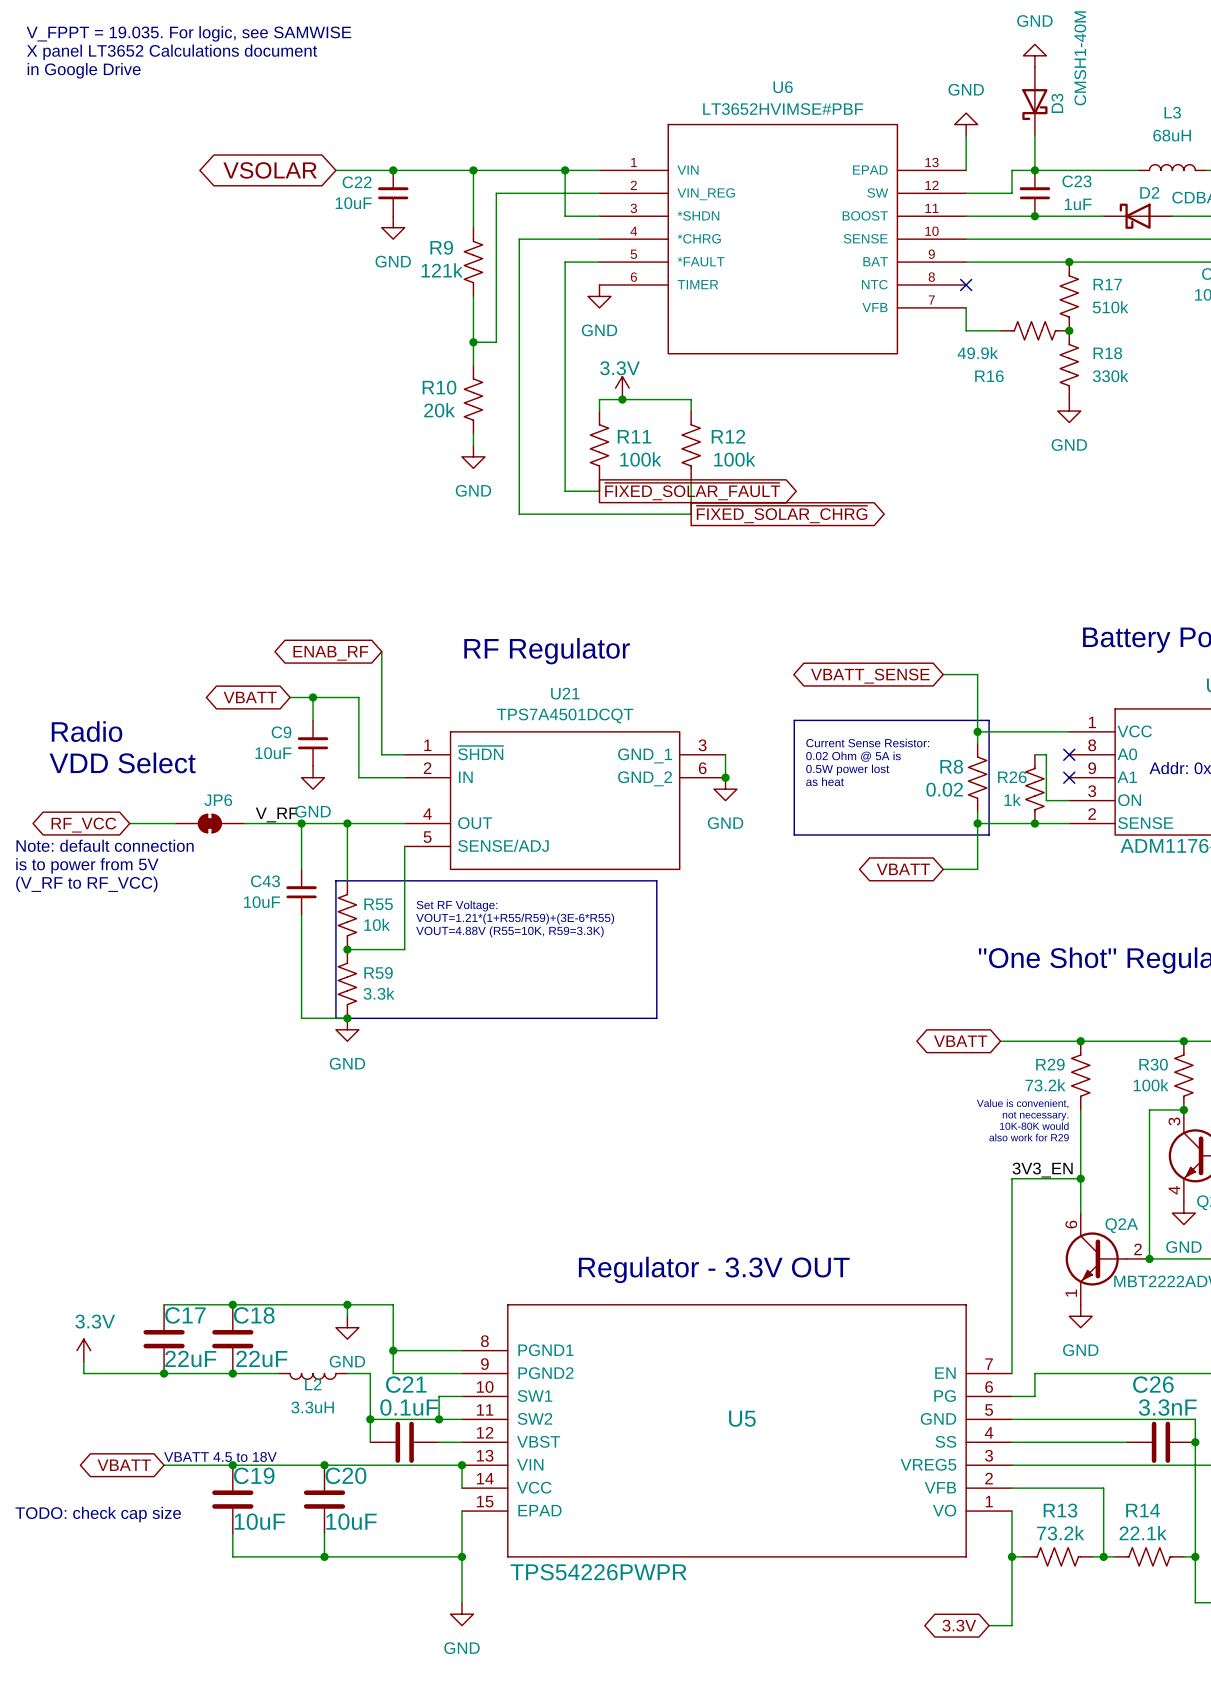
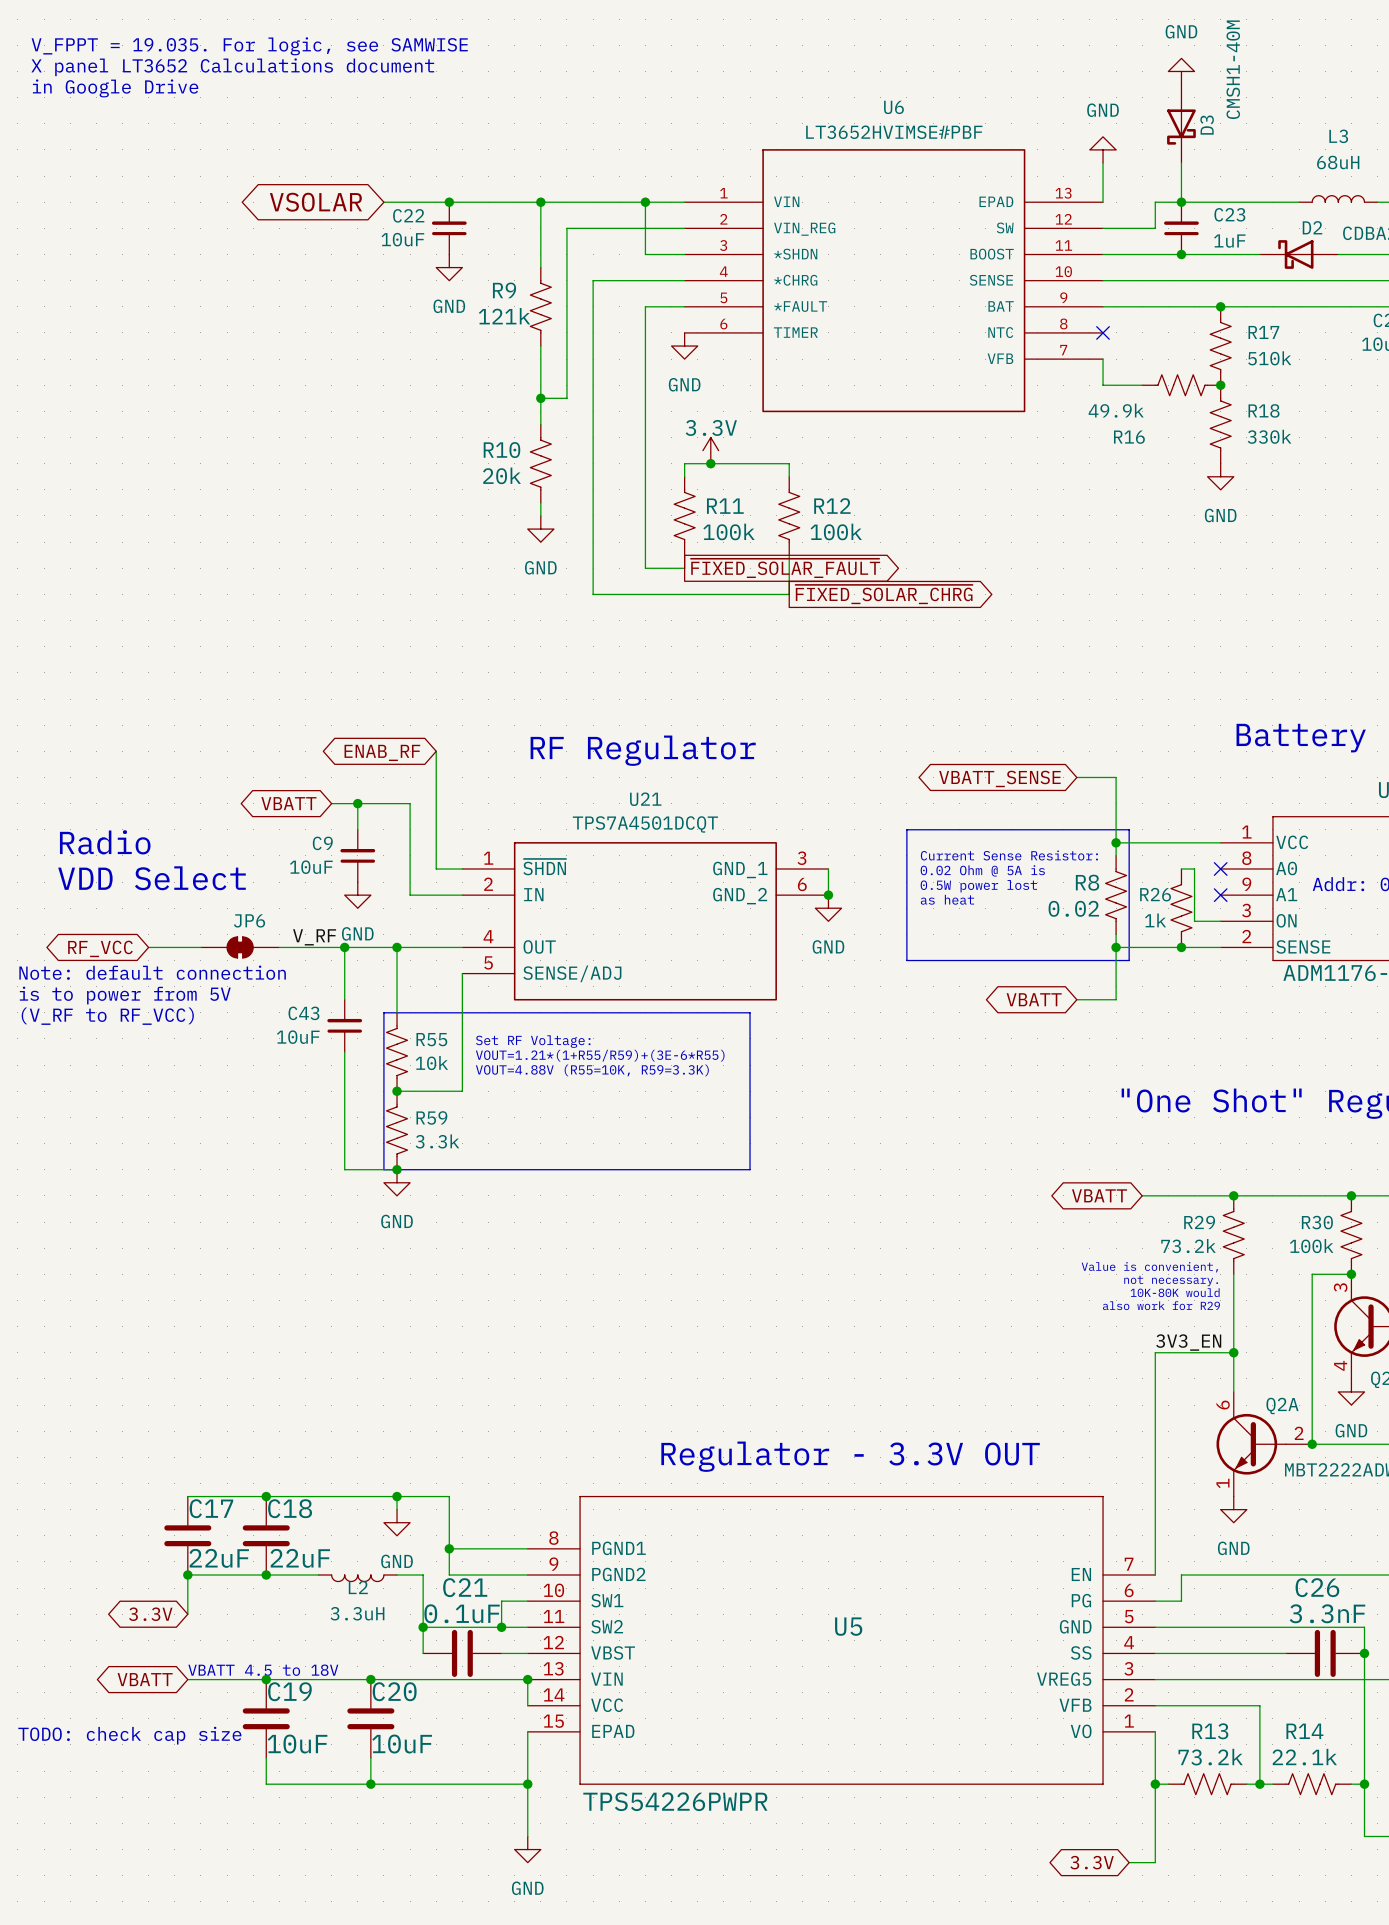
power symbol: 3.3V (83, 1350) -> none
wire: (83, 1362) (83, 1373) (164, 1373) -> (187, 1614) (187, 1575)
global label: none -> 3.3V (150, 1614)

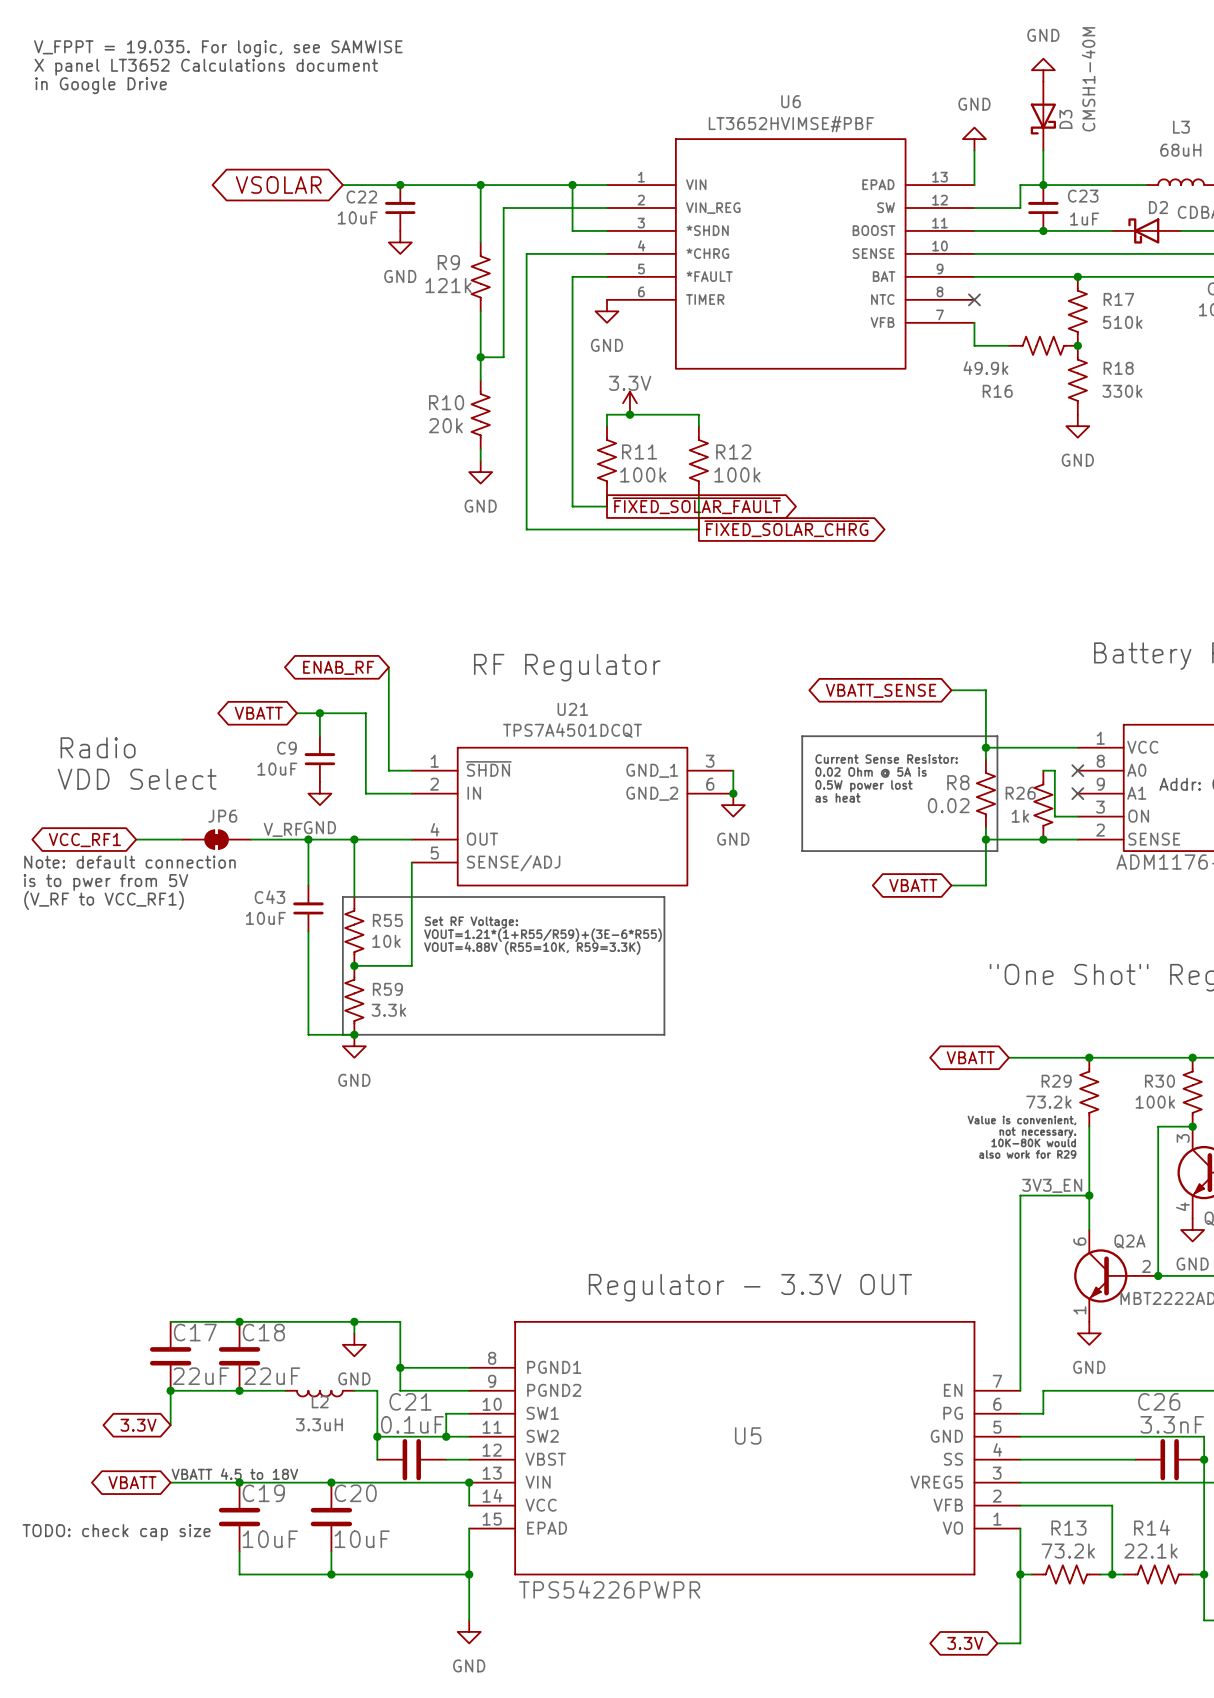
global label: RF_VCC (100, 948) -> VCC_RF1 (84, 840)
text: is to power from 5V (125, 995) -> is to pwer from 5V (105, 882)
text: (V_RF to RF_VCC) (107, 1016) -> (V_RF to VCC_RF1) (104, 900)

